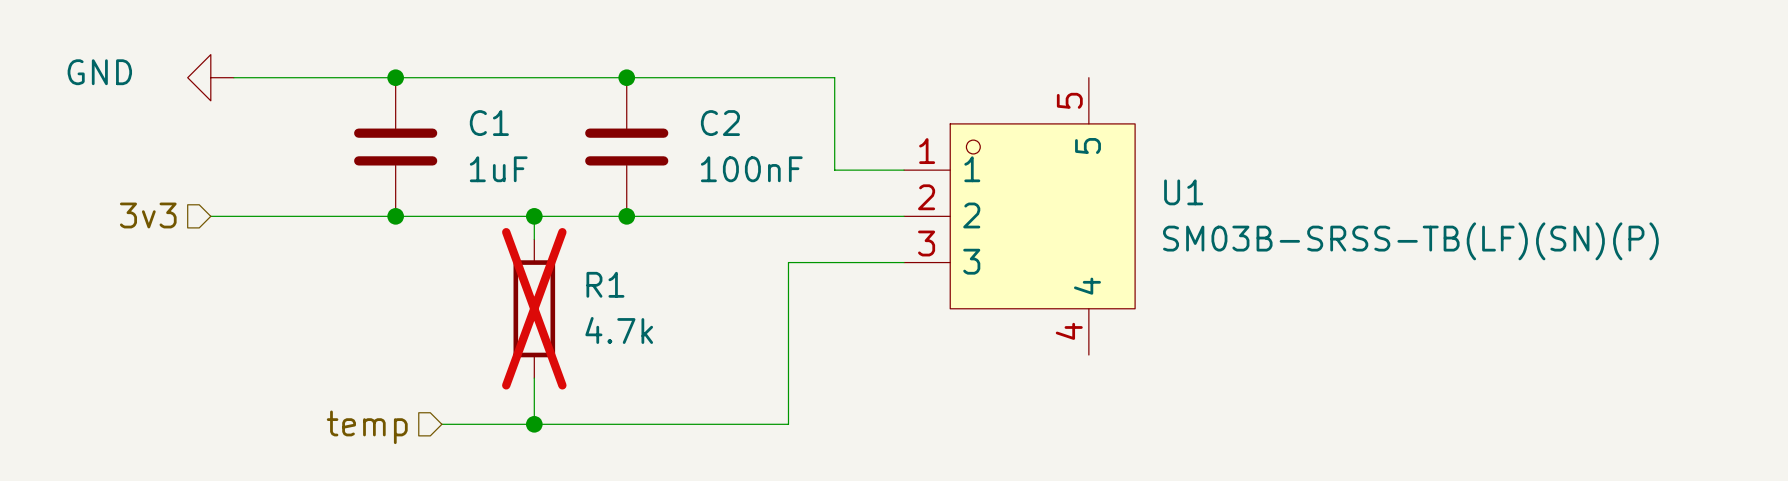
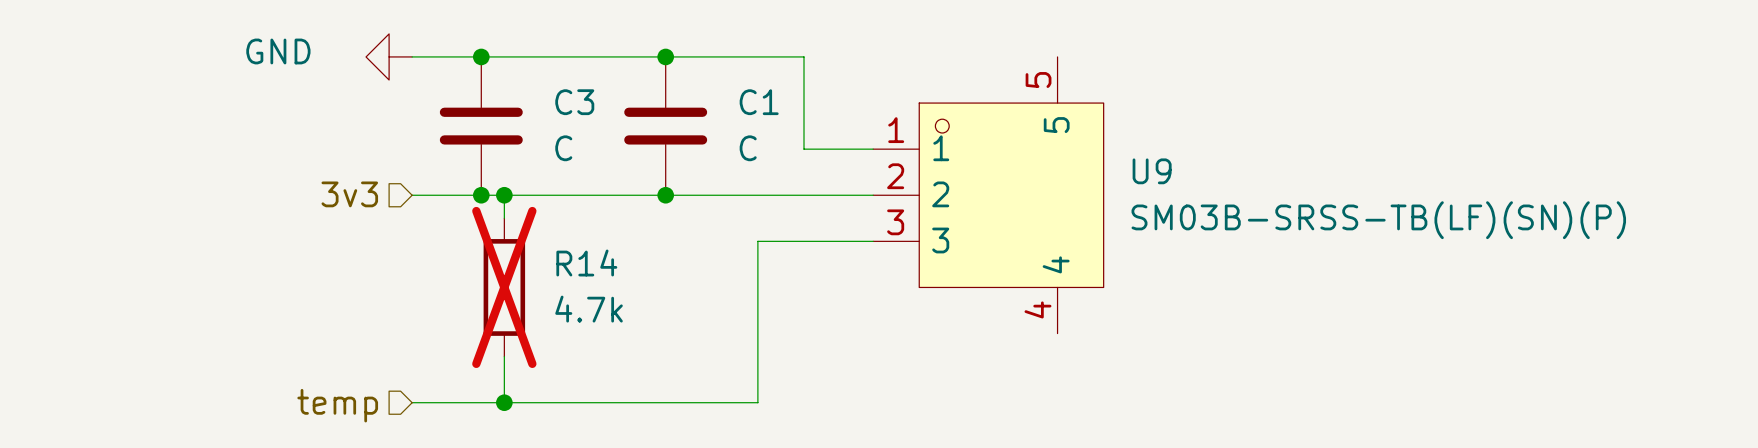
power symbol position: GND (210, 77) -> GND (389, 56)
wire: (233, 77) (441, 77) -> none
junction: (395, 77) -> none
junction: none -> (481, 56)
junction: (626, 77) -> none
junction: none -> (665, 56)
C1 position: (395, 147) -> (665, 126)
C3: none -> C (481, 126)
C2: 100nF (626, 147) -> none
C1 value: 1uF (498, 169) -> C (748, 148)
U1 name: U1 (1183, 192) -> U9 (1152, 171)
hierarchical label position: 3v3 (148, 215) -> 3v3 (349, 194)
wire: (210, 216) (441, 216) -> none
junction: (395, 216) -> none
junction: none -> (481, 195)
junction: (626, 216) -> none
junction: none -> (665, 195)
R1 name: R1 (605, 284) -> R14 (586, 262)

